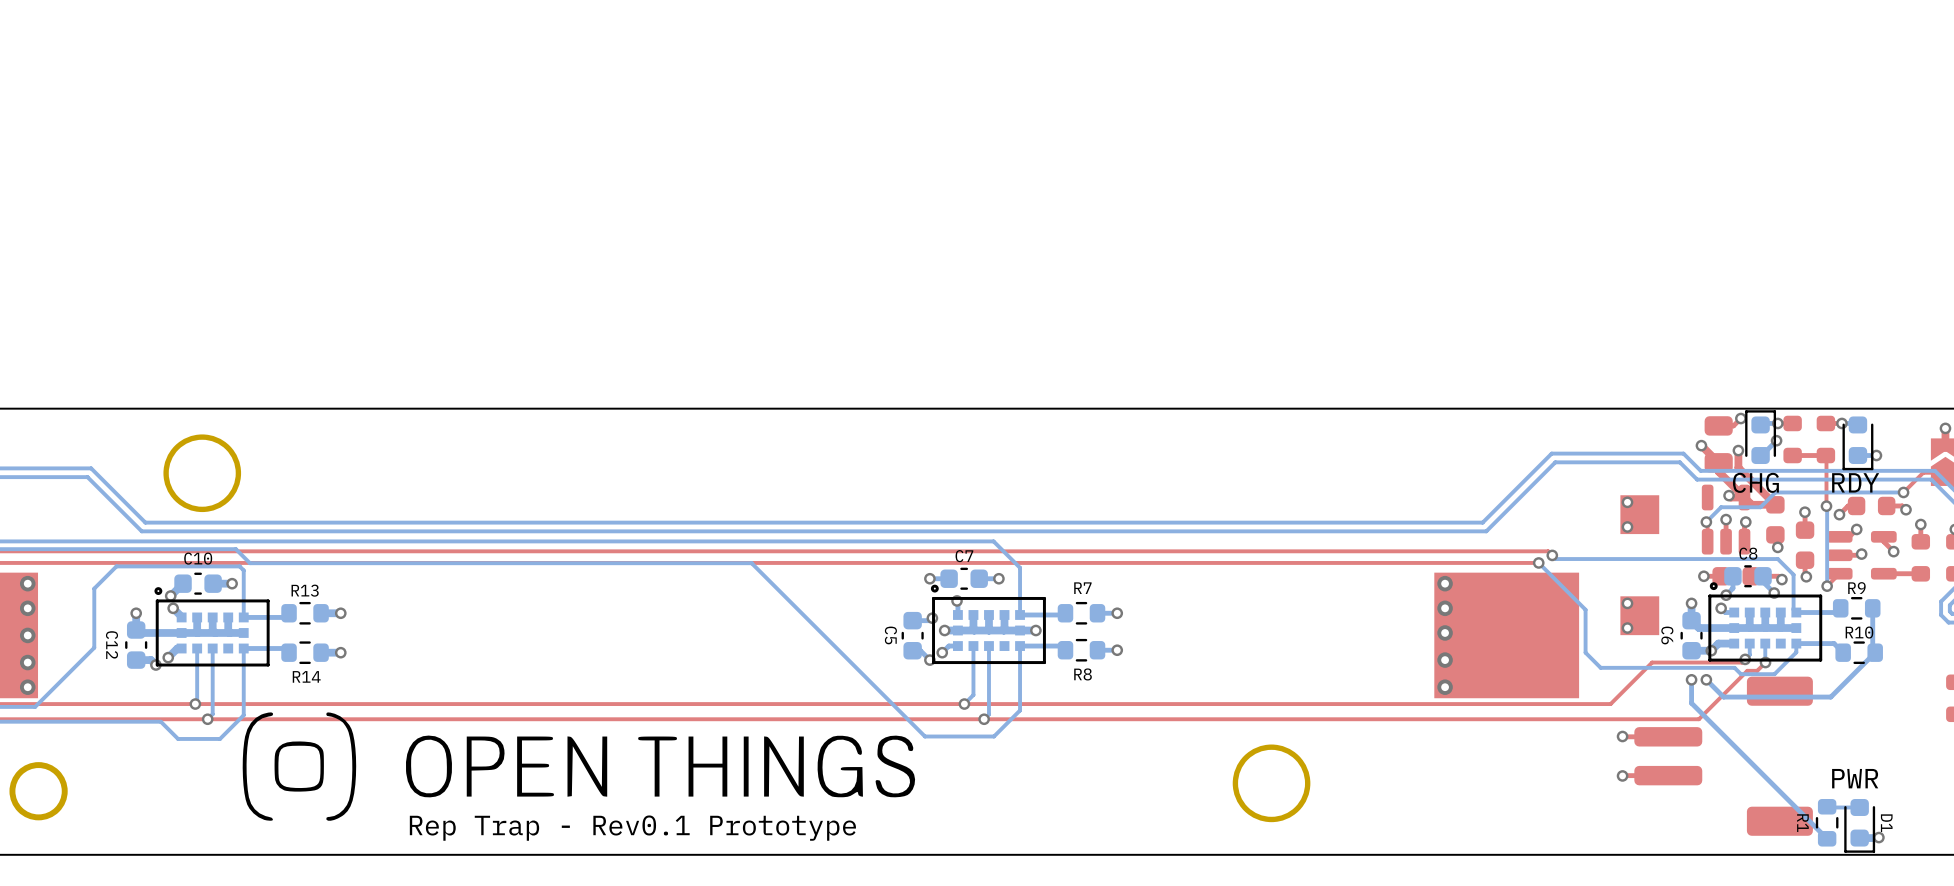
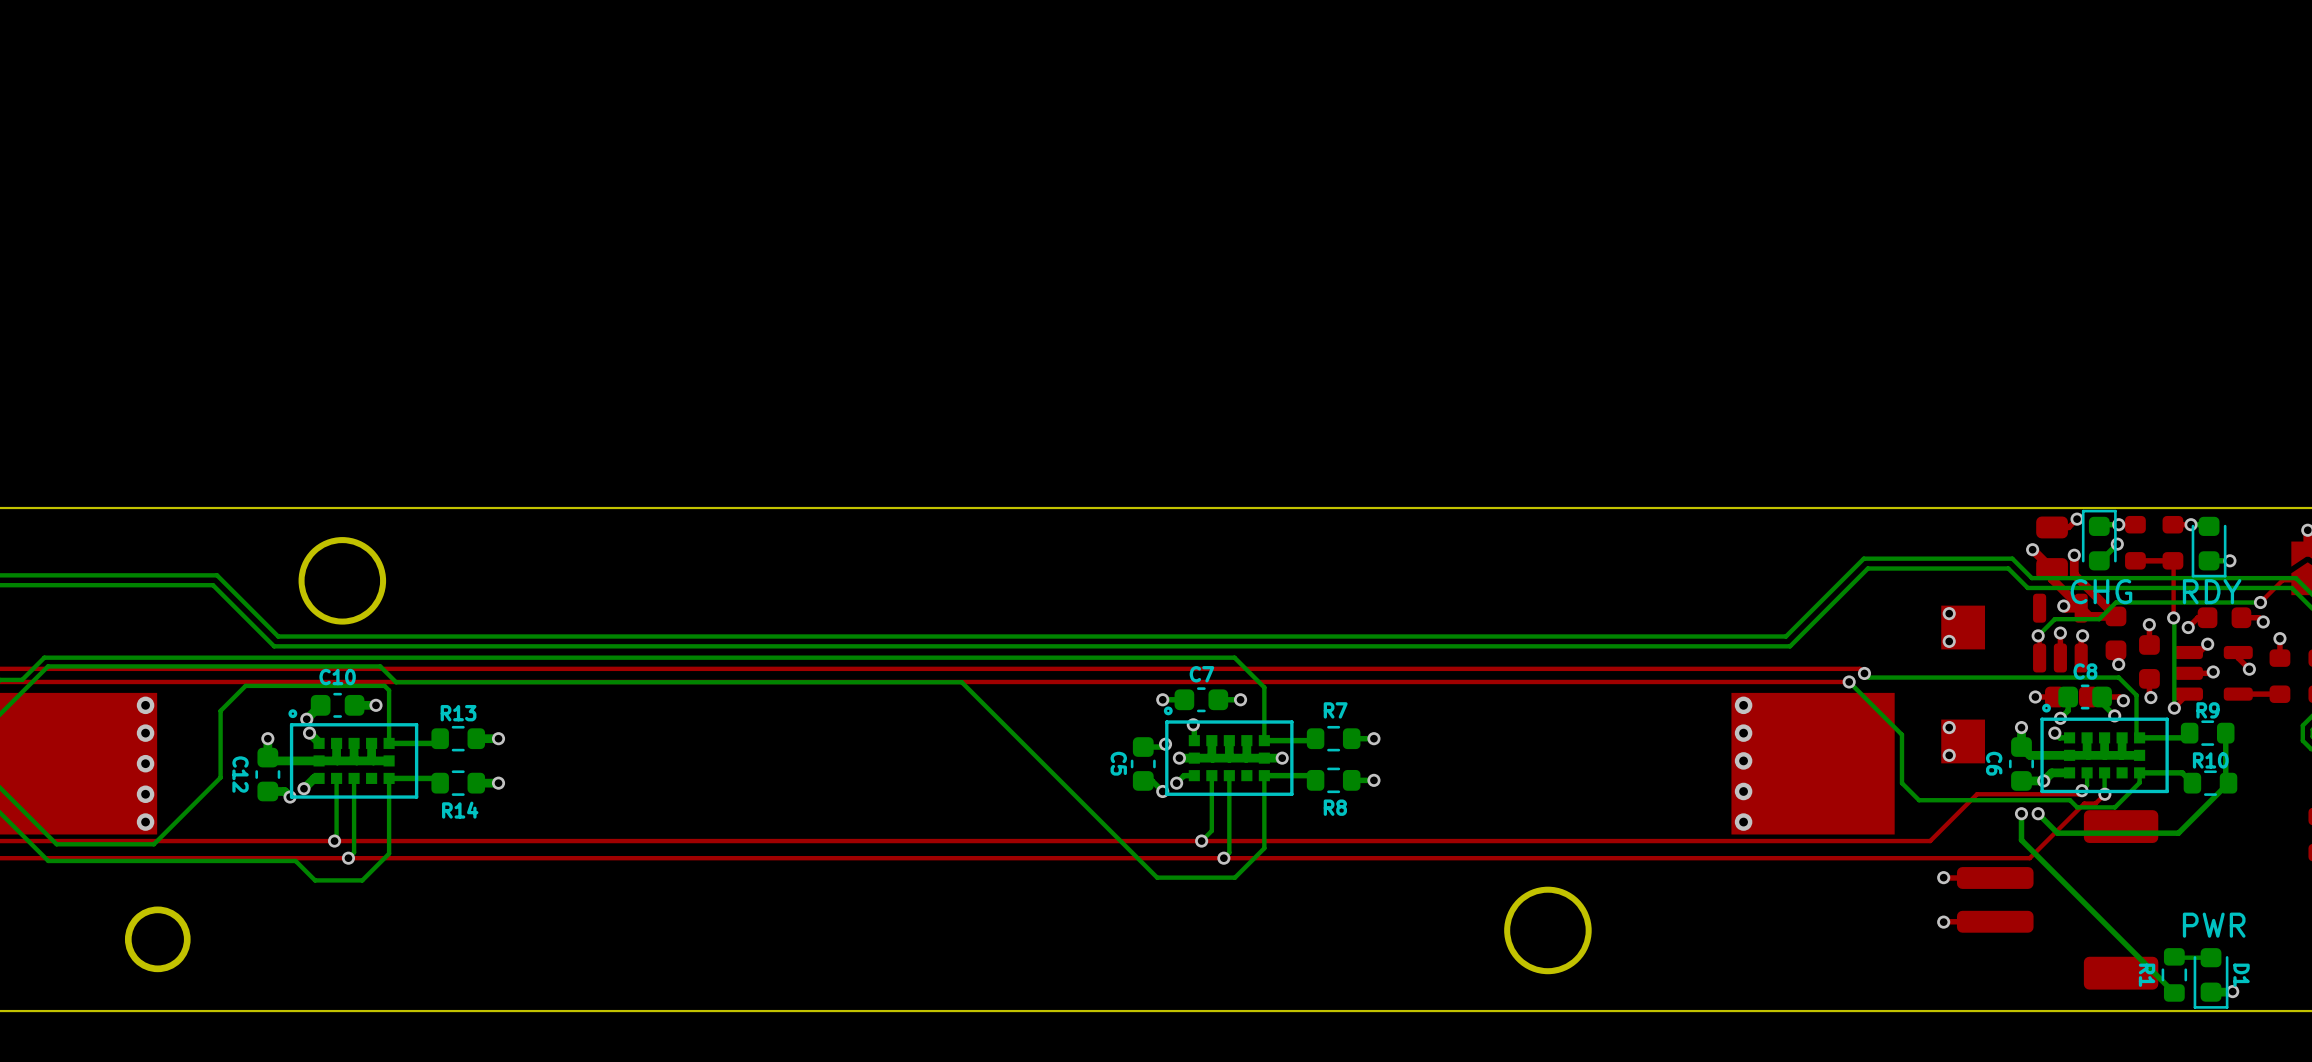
drawing: [242, 712, 916, 821] -> none
text: Rep Trap - Rev0.1 Prototype (632, 828) -> none

